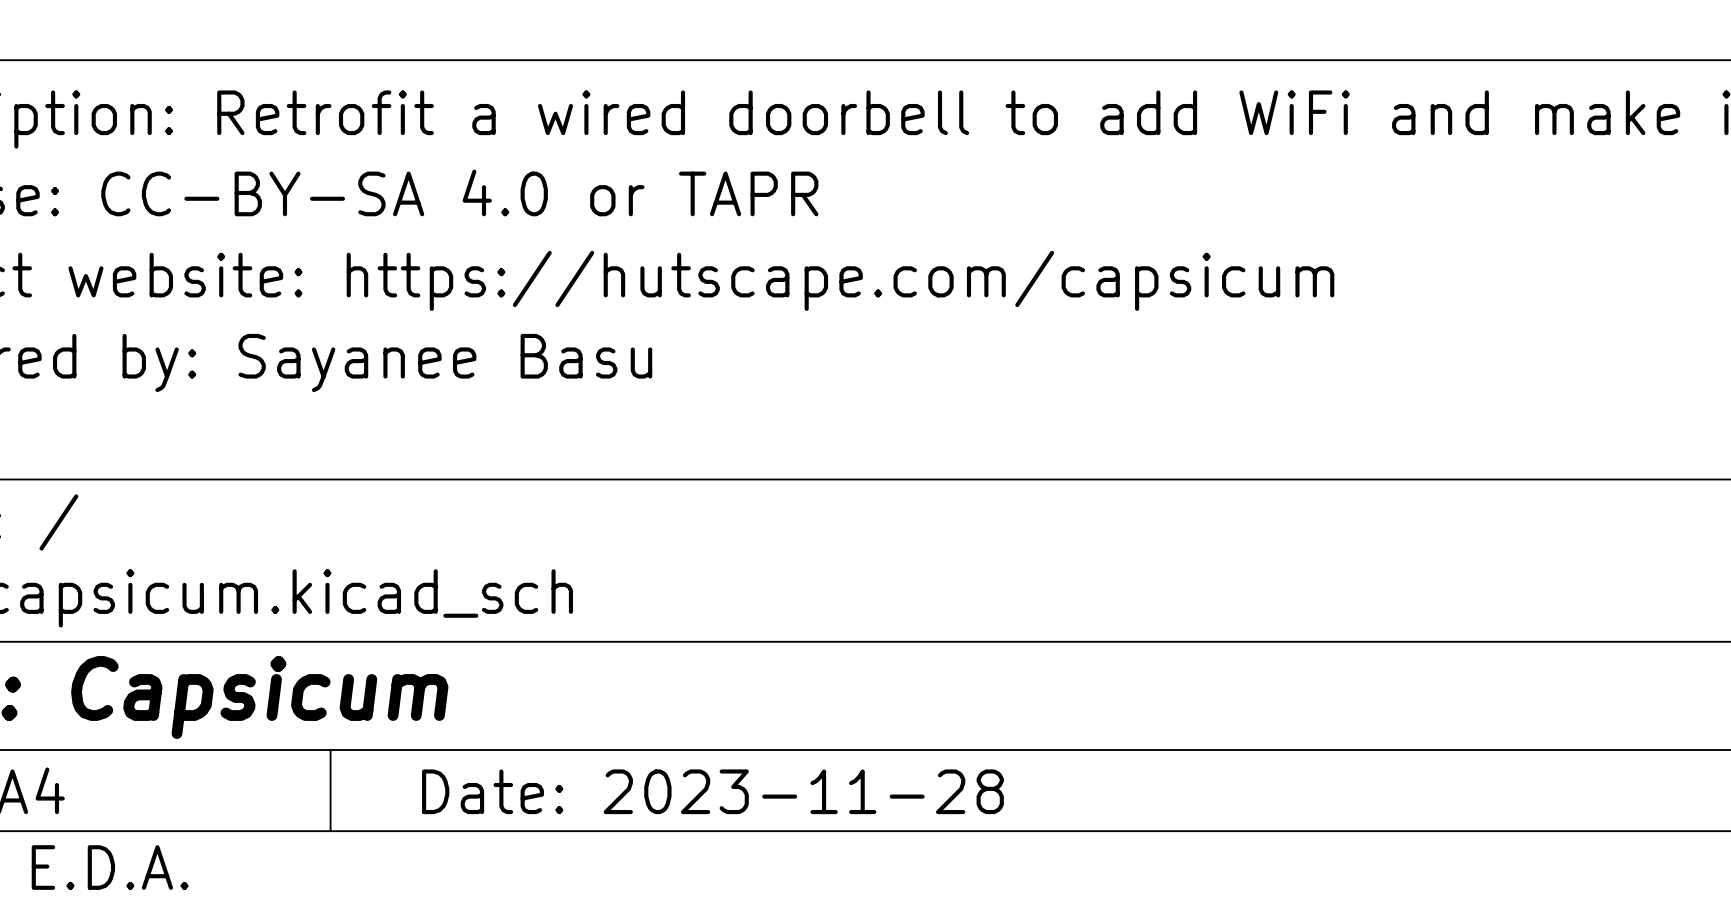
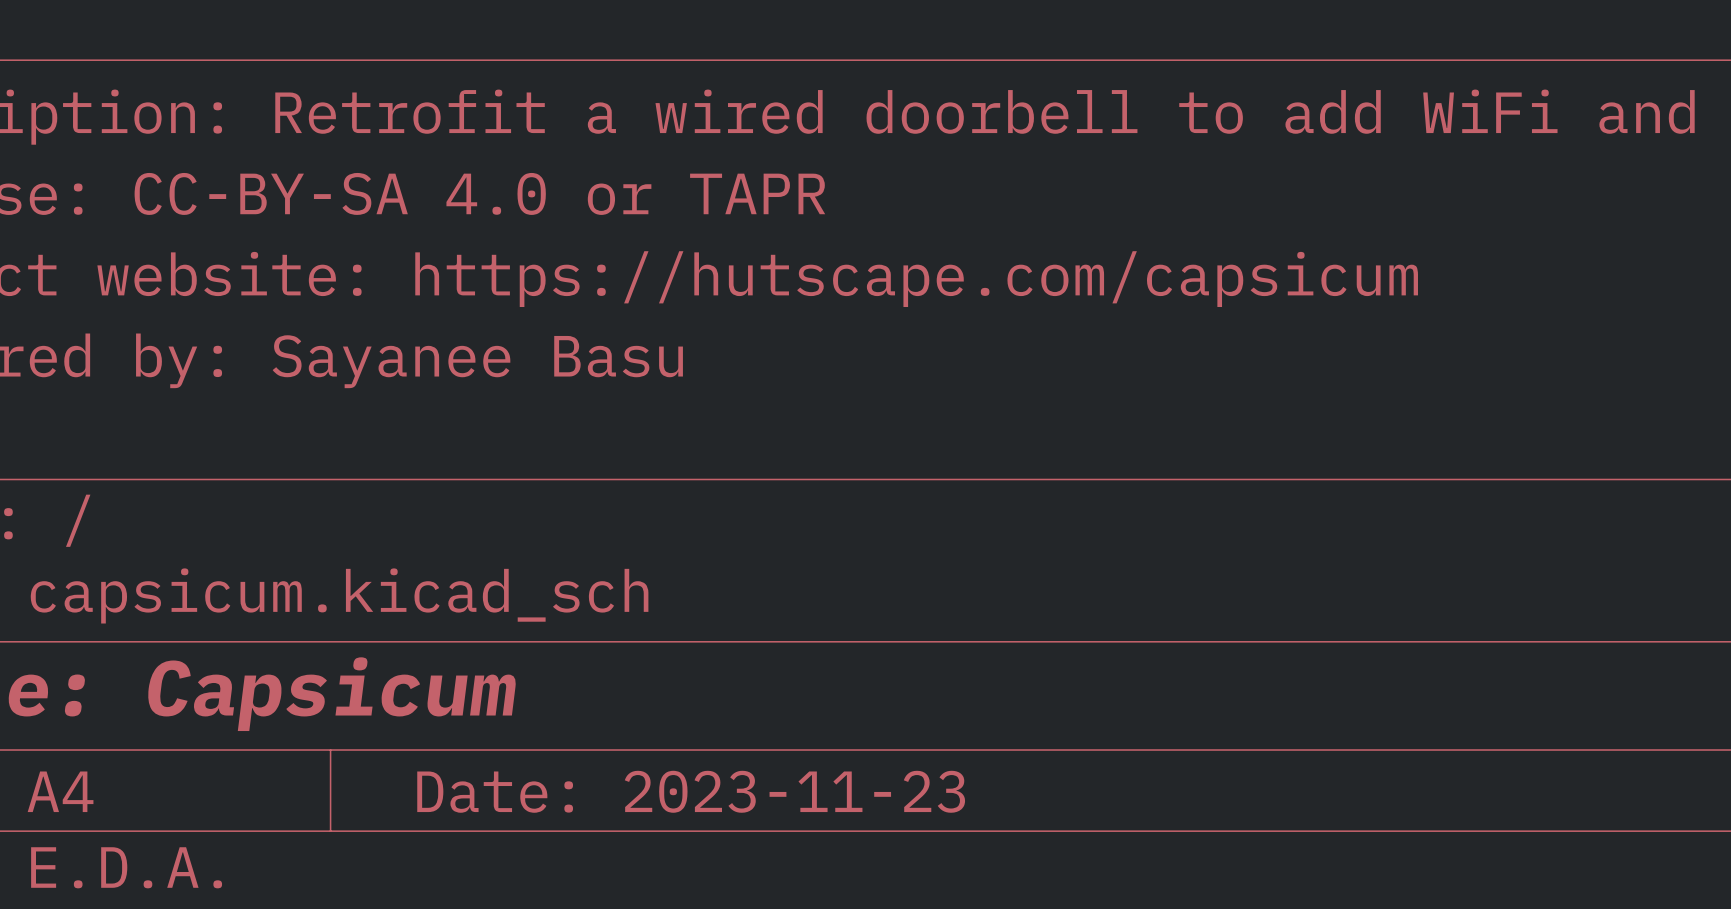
title block: Date: 2023-11-28 (712, 791) -> Date: 2023-11-23 (691, 791)

